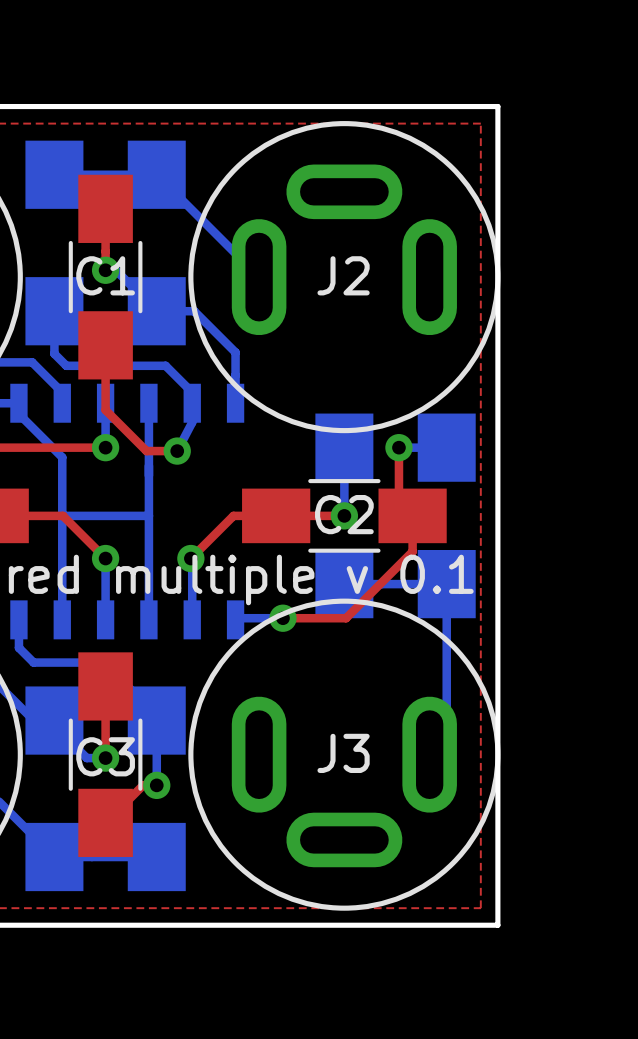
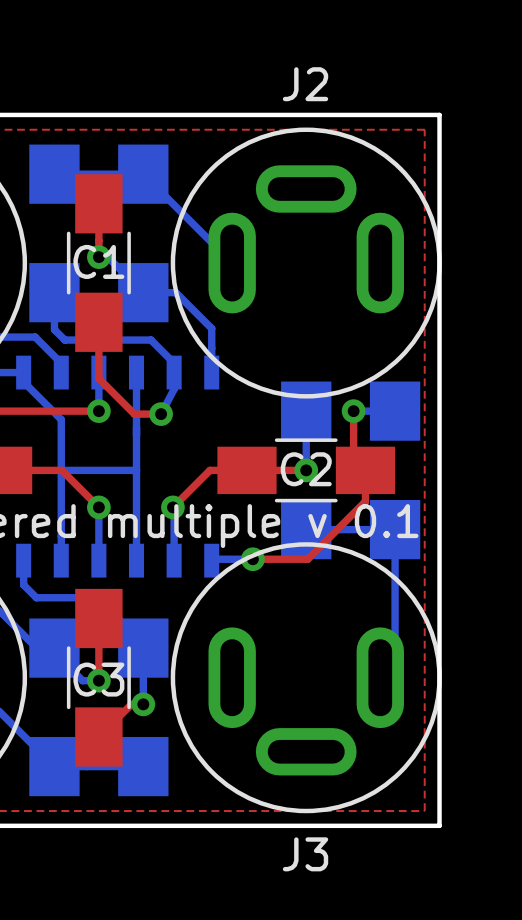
J2 name position: J2 (343, 275) -> J2 (305, 84)
J3 name position: J3 (343, 753) -> J3 (305, 854)

